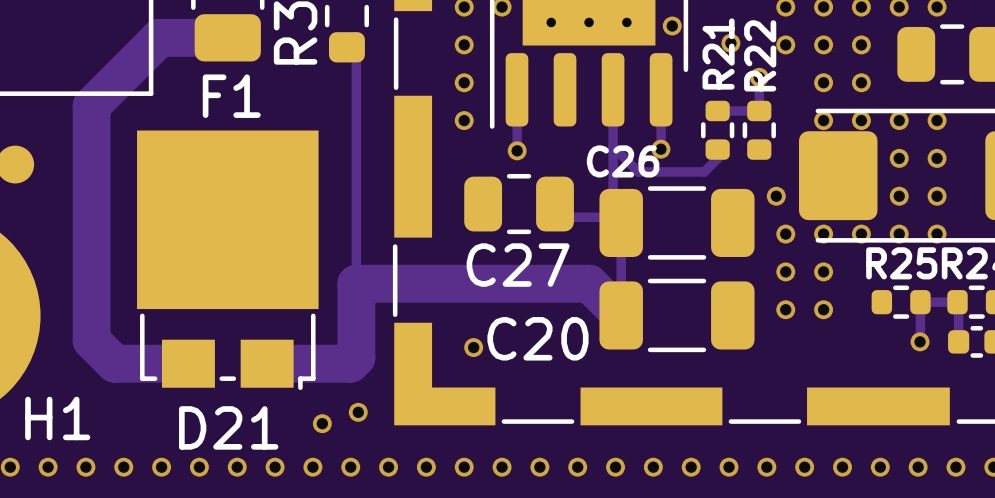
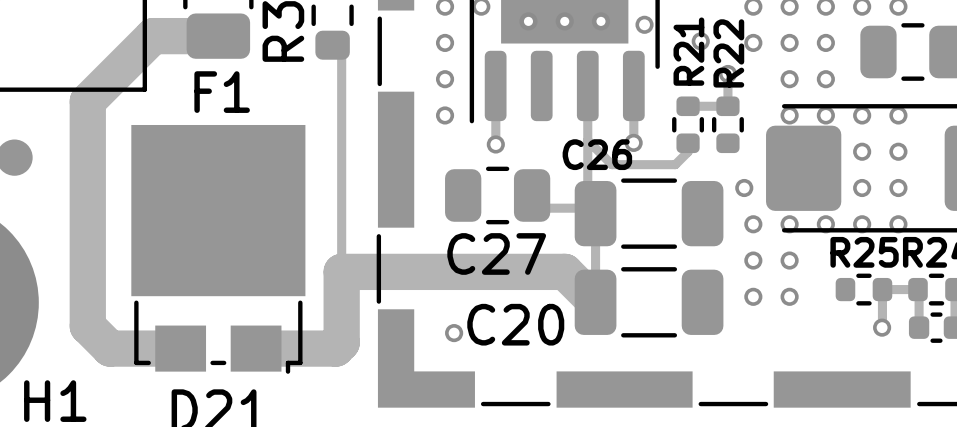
via: (358, 412) -> none
via: (322, 423) -> none

